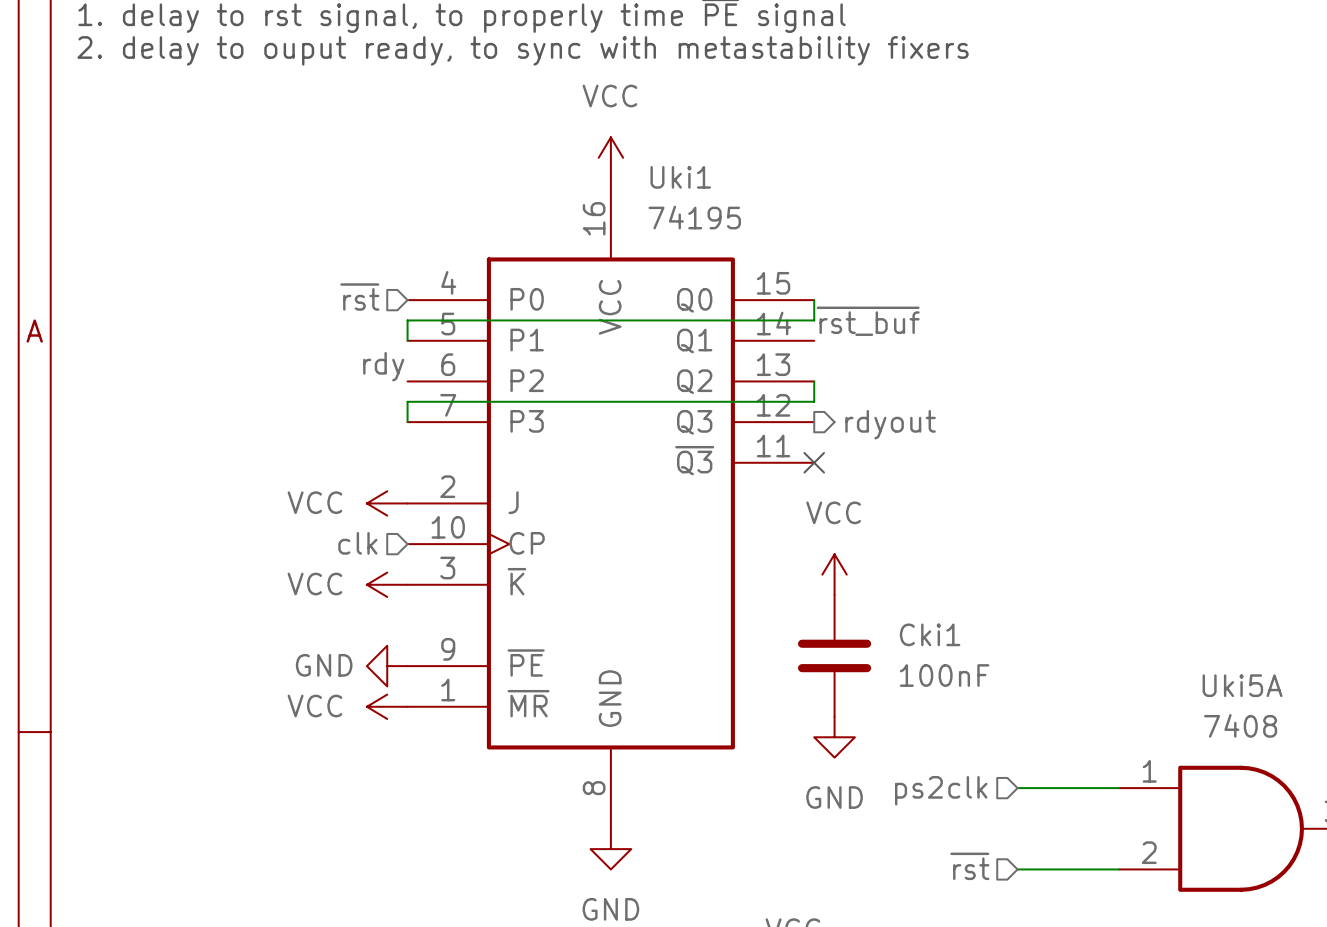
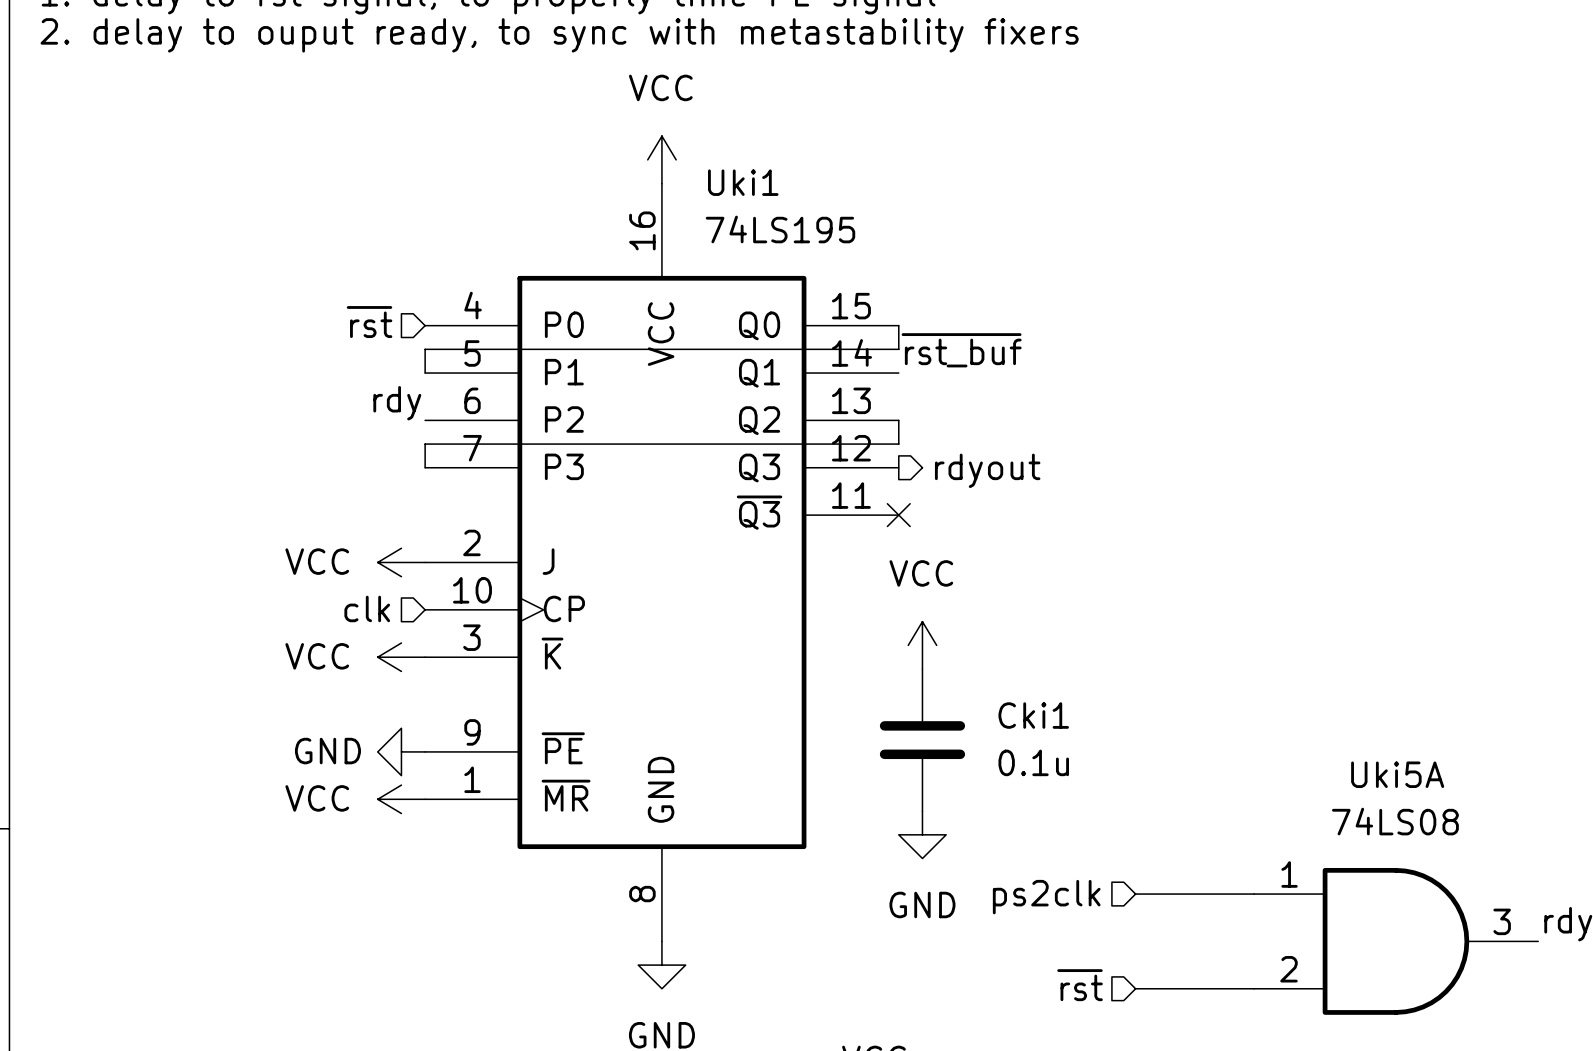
Uki1 value: 74195 (694, 217) -> 74LS195 (780, 229)
Cki1 value: 100nF (944, 675) -> 0.1u (1033, 762)
Uki5A value: 7408 (1240, 725) -> 74LS08 (1395, 821)

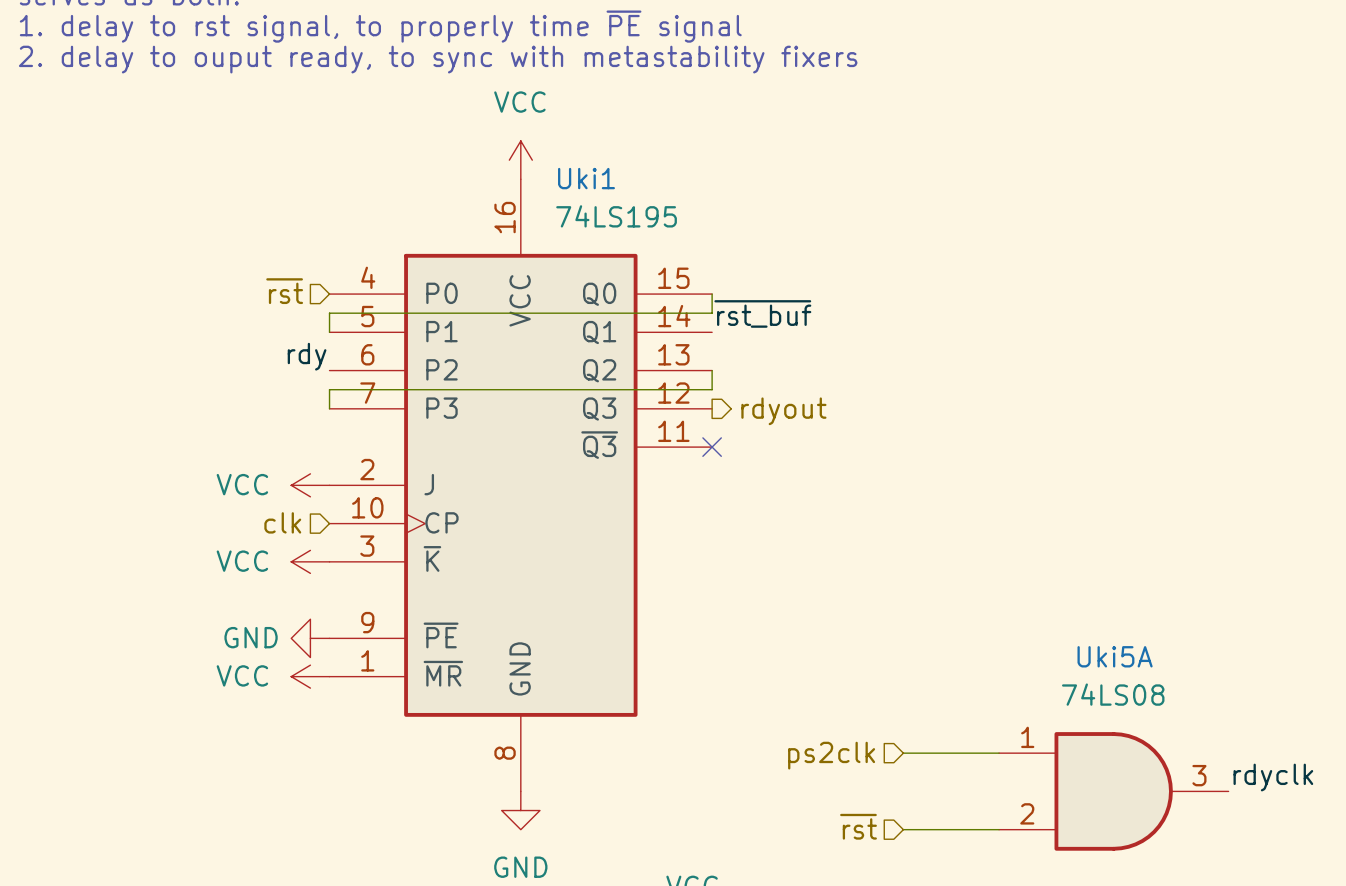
power symbol: VCC (922, 645) -> none
Cki1: 0.1u (922, 740) -> none
power symbol: GND (922, 834) -> none

